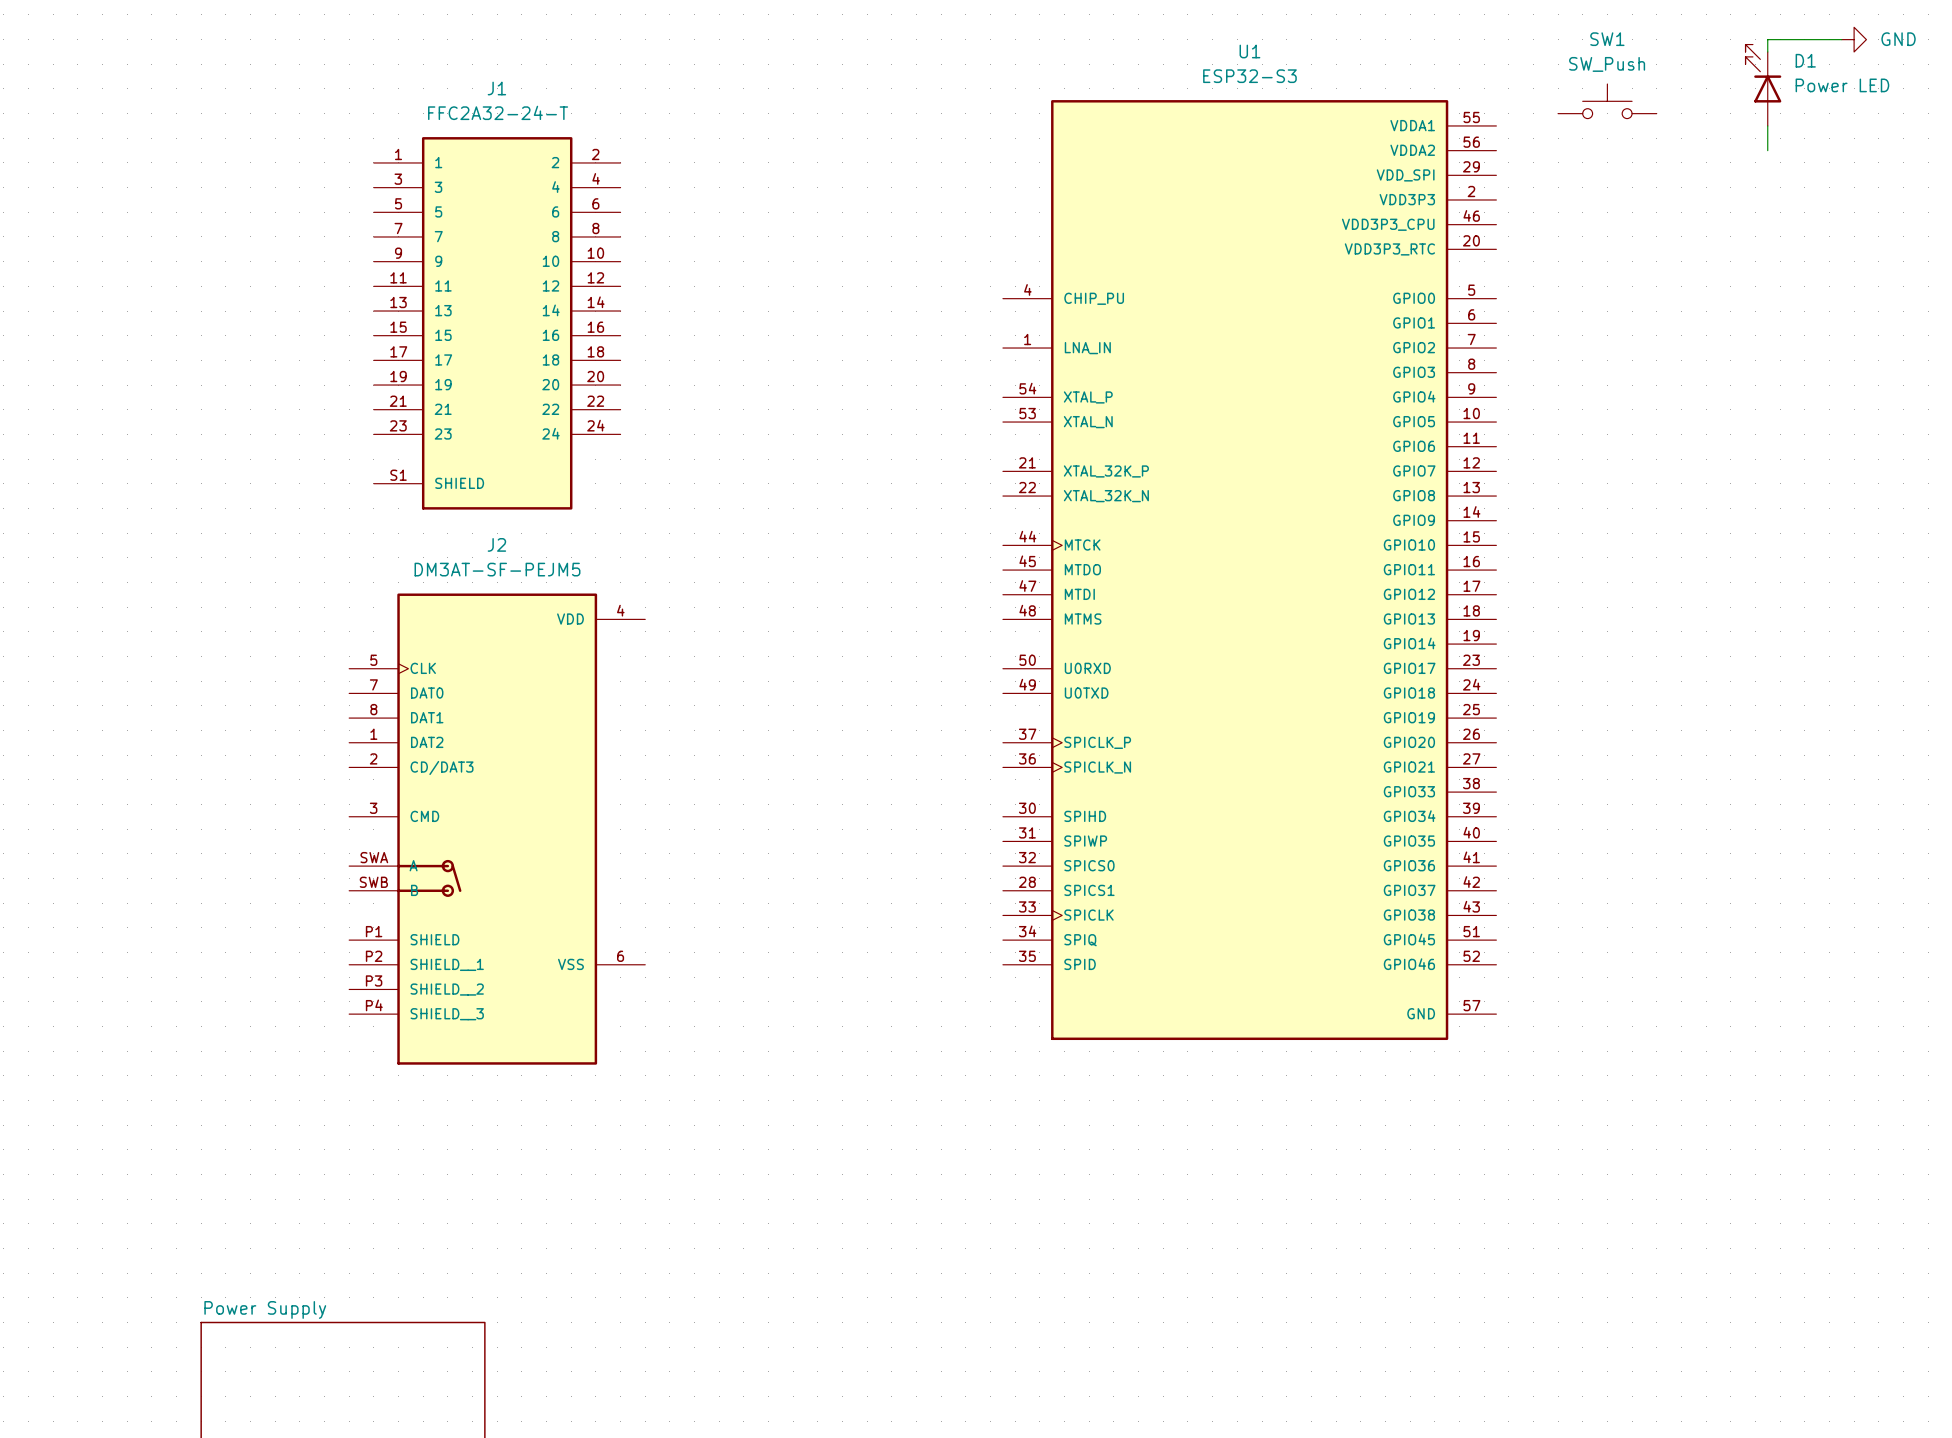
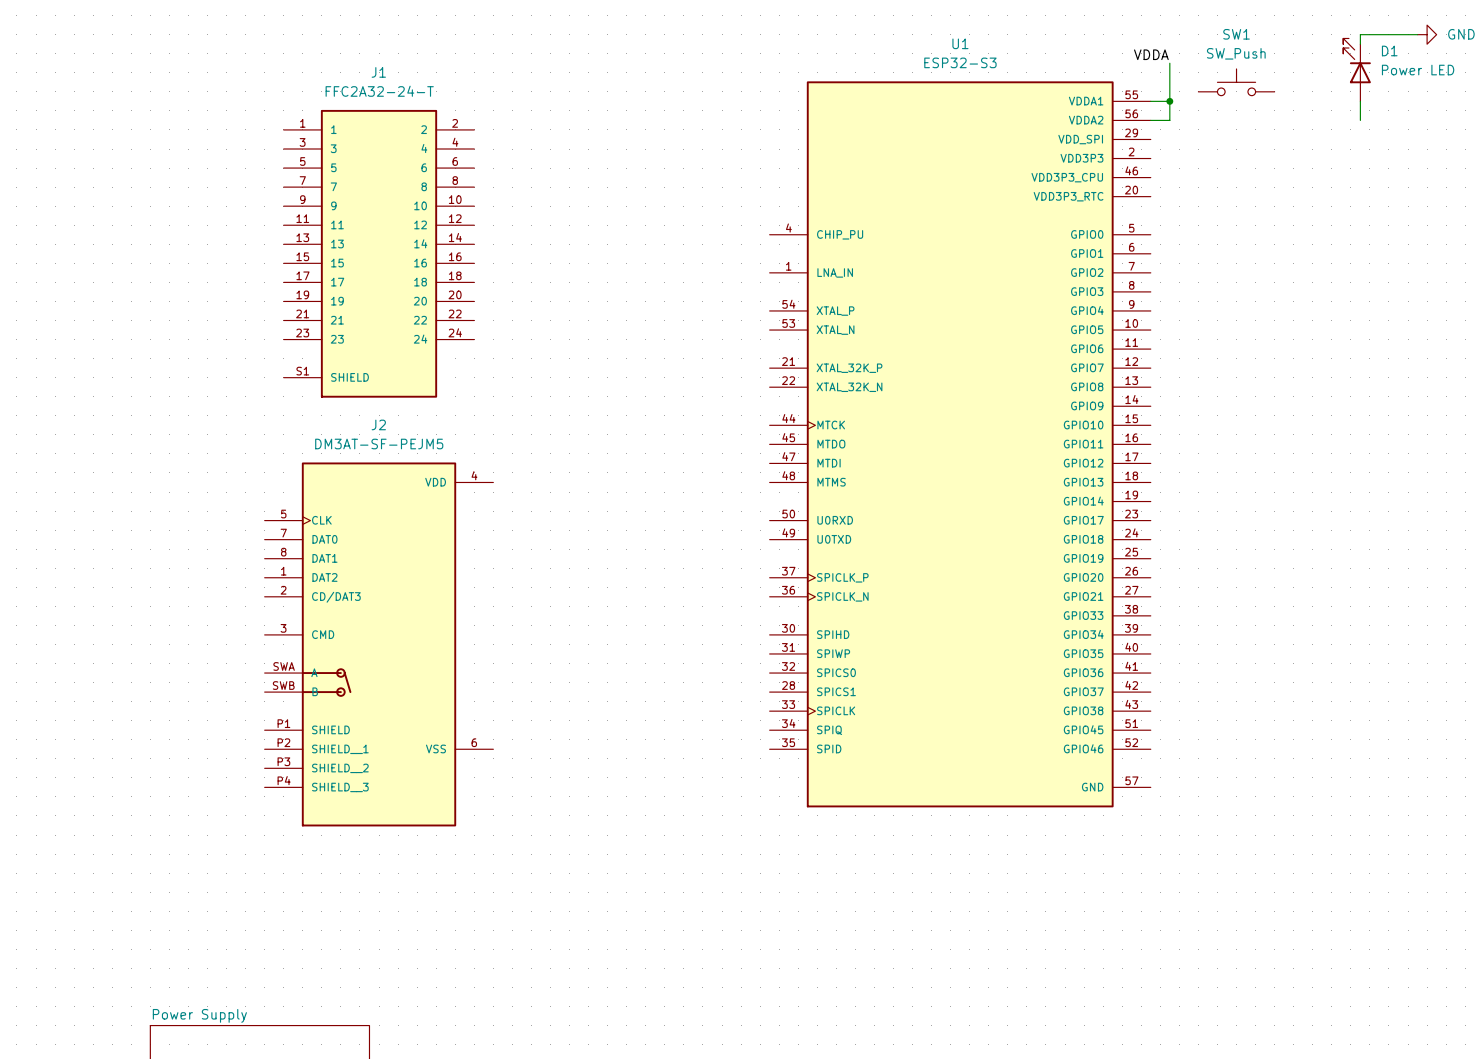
label: none -> VDDA (1151, 54)
wire: none -> (1169, 63) (1169, 120) (1150, 120)
wire: none -> (1150, 101) (1169, 101)
junction: none -> (1169, 101)

